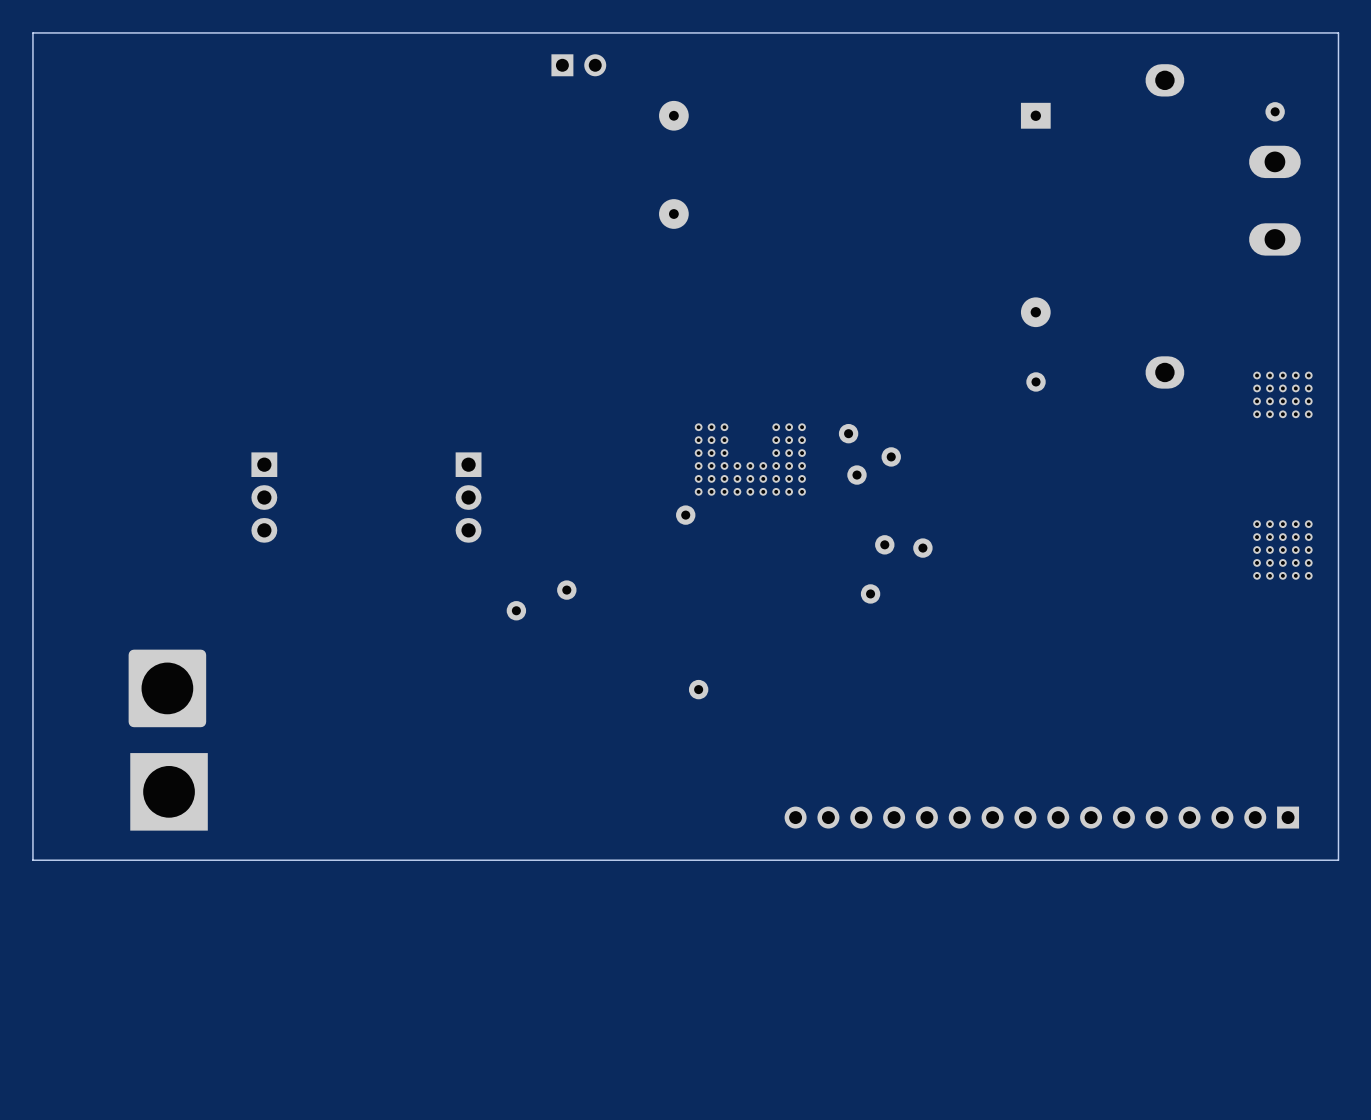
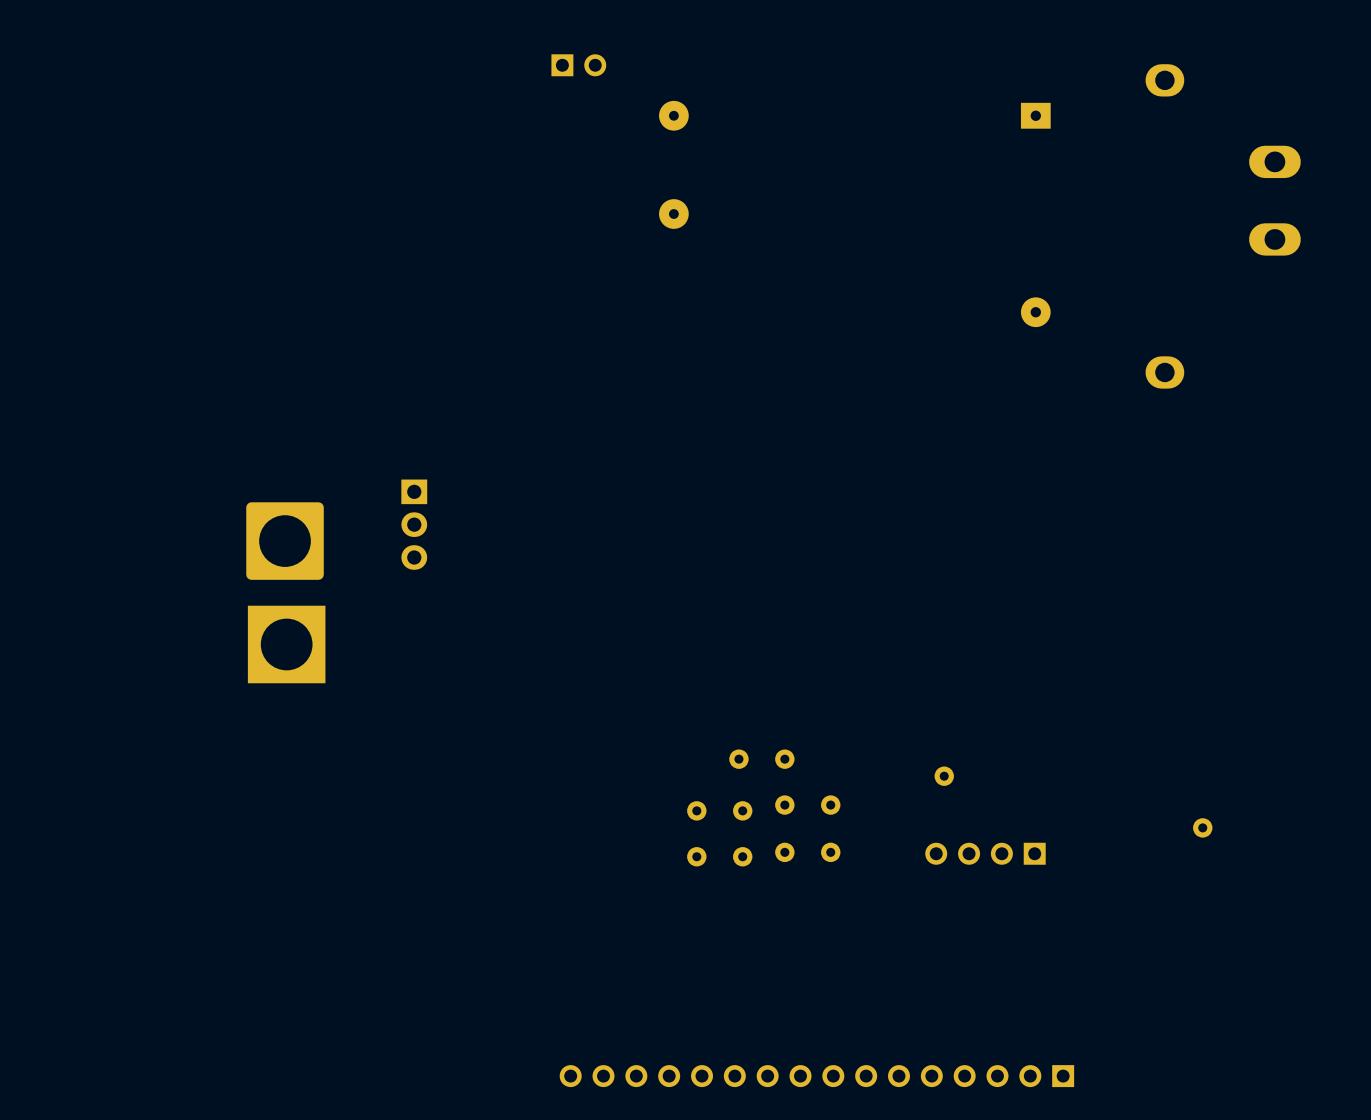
board edge: (1338, 32) (32, 32) (32, 860) (1338, 860) (1338, 32) -> none
part: (1275, 111) -> none
part: (1257, 375) -> none
part: (1269, 375) -> none
part: (1282, 375) -> none
part: (1295, 375) -> none
part: (1308, 375) -> none
part: (1036, 381) -> none
part: (1257, 388) -> none
part: (1269, 388) -> none
part: (1282, 388) -> none
part: (1295, 388) -> none
part: (1308, 388) -> none
part: (1257, 401) -> none
part: (1269, 401) -> none
part: (1282, 401) -> none
part: (1295, 401) -> none
part: (1308, 401) -> none
part: (1257, 414) -> none
part: (1269, 414) -> none
part: (1282, 414) -> none
part: (1295, 414) -> none
part: (1308, 414) -> none
part: (698, 427) -> none
part: (711, 427) -> none
part: (724, 427) -> none
part: (776, 427) -> none
part: (789, 427) -> none
part: (802, 427) -> none
part: (848, 433) -> none
part: (698, 440) -> none
part: (711, 440) -> none
part: (724, 440) -> none
part: (776, 440) -> none
part: (789, 440) -> none
part: (802, 440) -> none
part: (698, 453) -> none
part: (711, 453) -> none
part: (724, 453) -> none
part: (776, 453) -> none
part: (789, 453) -> none
part: (802, 453) -> none
part: (891, 456) -> none
part: (698, 465) -> none
part: (711, 465) -> none
part: (724, 465) -> none
part: (737, 465) -> none
part: (750, 465) -> none
part: (763, 465) -> none
part: (776, 465) -> none
part: (789, 465) -> none
part: (802, 465) -> none
part: (856, 475) -> none
part: (698, 478) -> none
part: (711, 478) -> none
part: (724, 478) -> none
part: (737, 478) -> none
part: (750, 478) -> none
part: (763, 478) -> none
part: (776, 478) -> none
part: (789, 478) -> none
part: (802, 478) -> none
part: (698, 491) -> none
part: (711, 491) -> none
part: (724, 491) -> none
part: (737, 491) -> none
part: (750, 491) -> none
part: (763, 491) -> none
part: (776, 491) -> none
part: (789, 491) -> none
part: (802, 491) -> none
part: (264, 497) -> none
part position: (468, 497) -> (414, 524)
part: (685, 515) -> none
part: (1257, 524) -> none
part: (1269, 524) -> none
part: (1282, 524) -> none
part: (1295, 524) -> none
part: (1308, 524) -> none
part: (1257, 537) -> none
part: (1269, 537) -> none
part: (1282, 537) -> none
part: (1295, 537) -> none
part: (1308, 537) -> none
part: (884, 544) -> none
part: (922, 548) -> none
part: (1257, 550) -> none
part: (1269, 550) -> none
part: (1282, 550) -> none
part: (1295, 550) -> none
part: (1308, 550) -> none
part: (1257, 562) -> none
part: (1269, 562) -> none
part: (1282, 562) -> none
part: (1295, 562) -> none
part: (1308, 562) -> none
part: (1257, 575) -> none
part: (1269, 575) -> none
part: (1282, 575) -> none
part: (1295, 575) -> none
part: (1308, 575) -> none
part: (566, 590) -> none
part: (870, 593) -> none
part: (516, 610) -> none
part: (698, 689) -> none
part position: (168, 740) -> (285, 592)
part: none -> (738, 759)
part: none -> (784, 759)
part: none -> (944, 776)
part: none -> (784, 805)
part: none -> (830, 805)
part: none -> (696, 810)
part: none -> (742, 810)
part: (1041, 817) -> none
part: none -> (1202, 827)
part: none -> (784, 852)
part: none -> (830, 852)
part: none -> (985, 853)
part: none -> (696, 856)
part: none -> (742, 856)
part: none -> (816, 1076)

